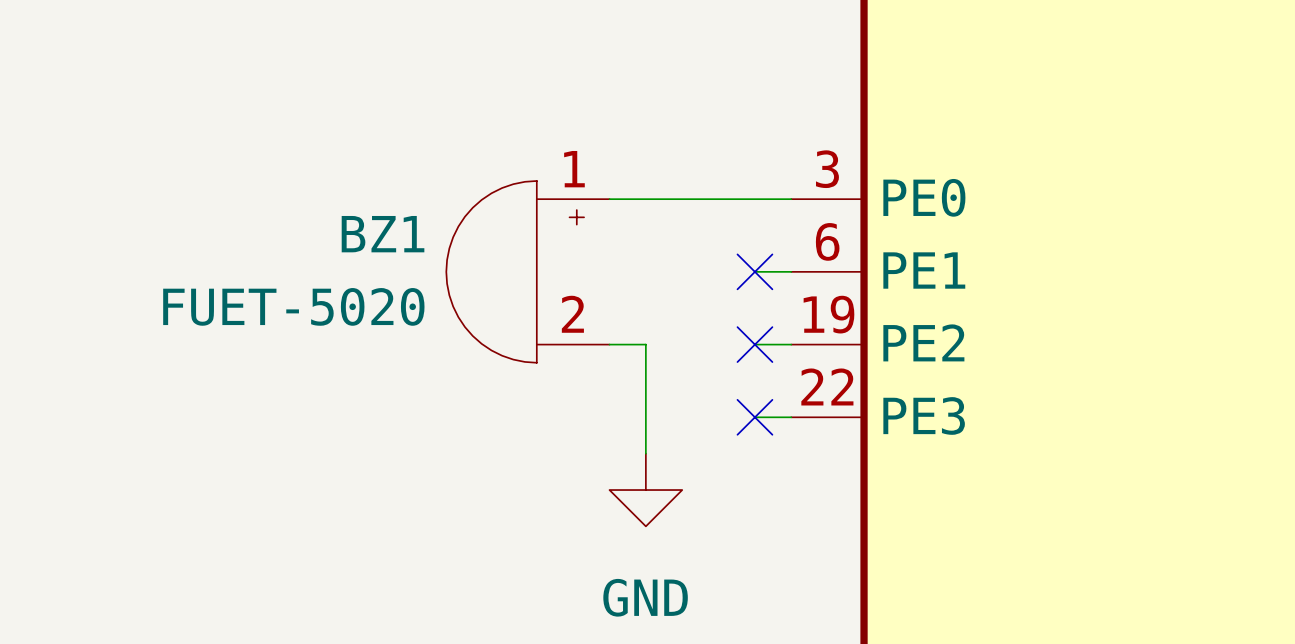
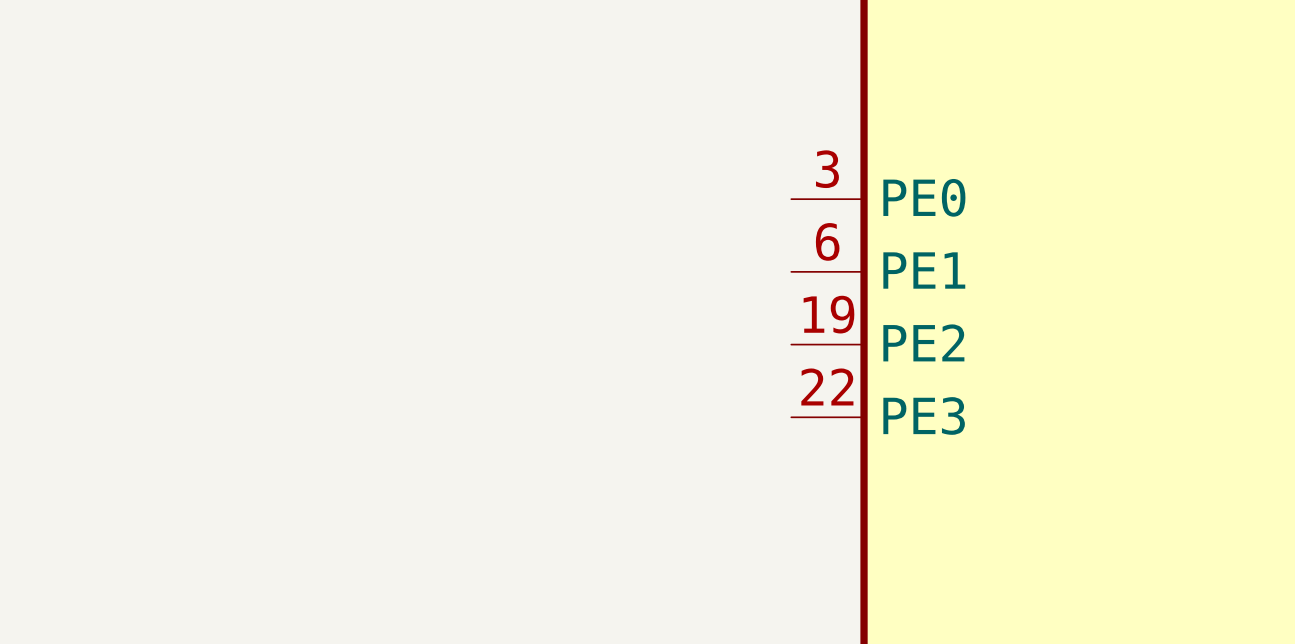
wire: (609, 199) (791, 199) -> none
BZ1: FUET-5020 (527, 271) -> none
wire: (754, 271) (791, 271) -> none
no-connect mark: (754, 271) -> none
wire: (609, 344) (645, 344) (645, 453) -> none
wire: (754, 344) (791, 344) -> none
no-connect mark: (754, 344) -> none
wire: (754, 417) (791, 417) -> none
no-connect mark: (754, 417) -> none
power symbol: GND (645, 490) -> none

